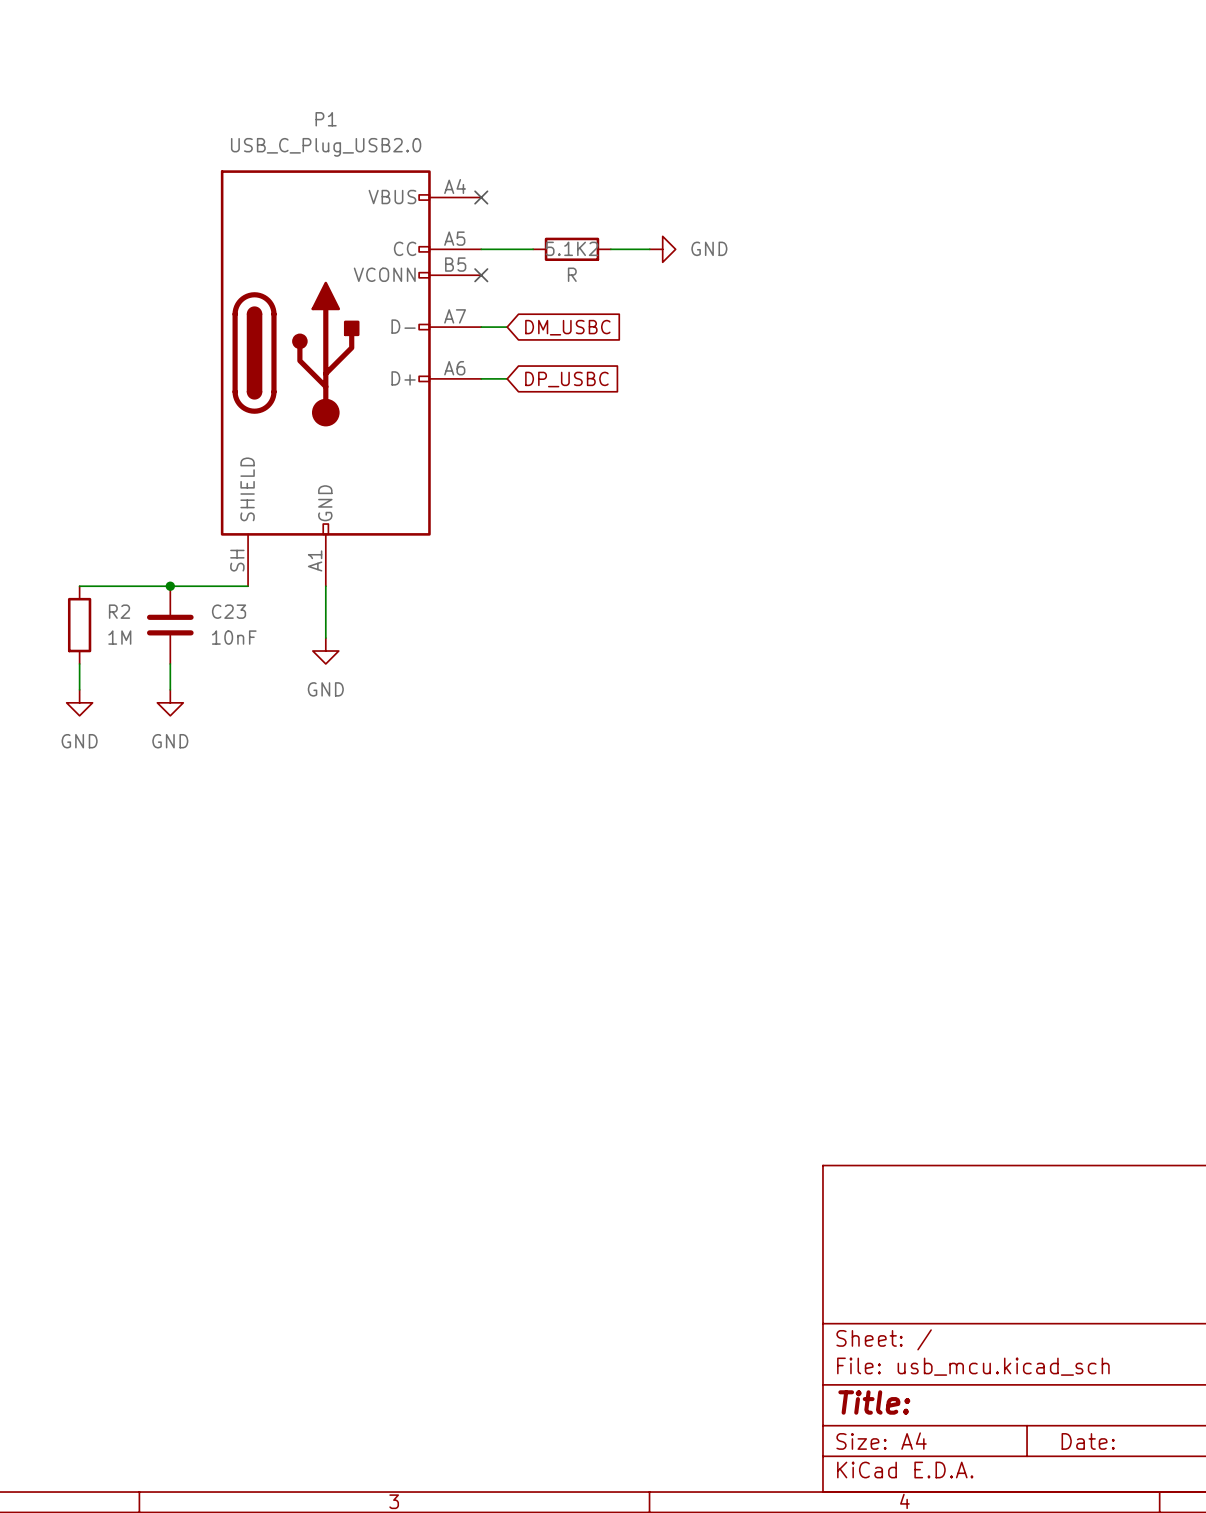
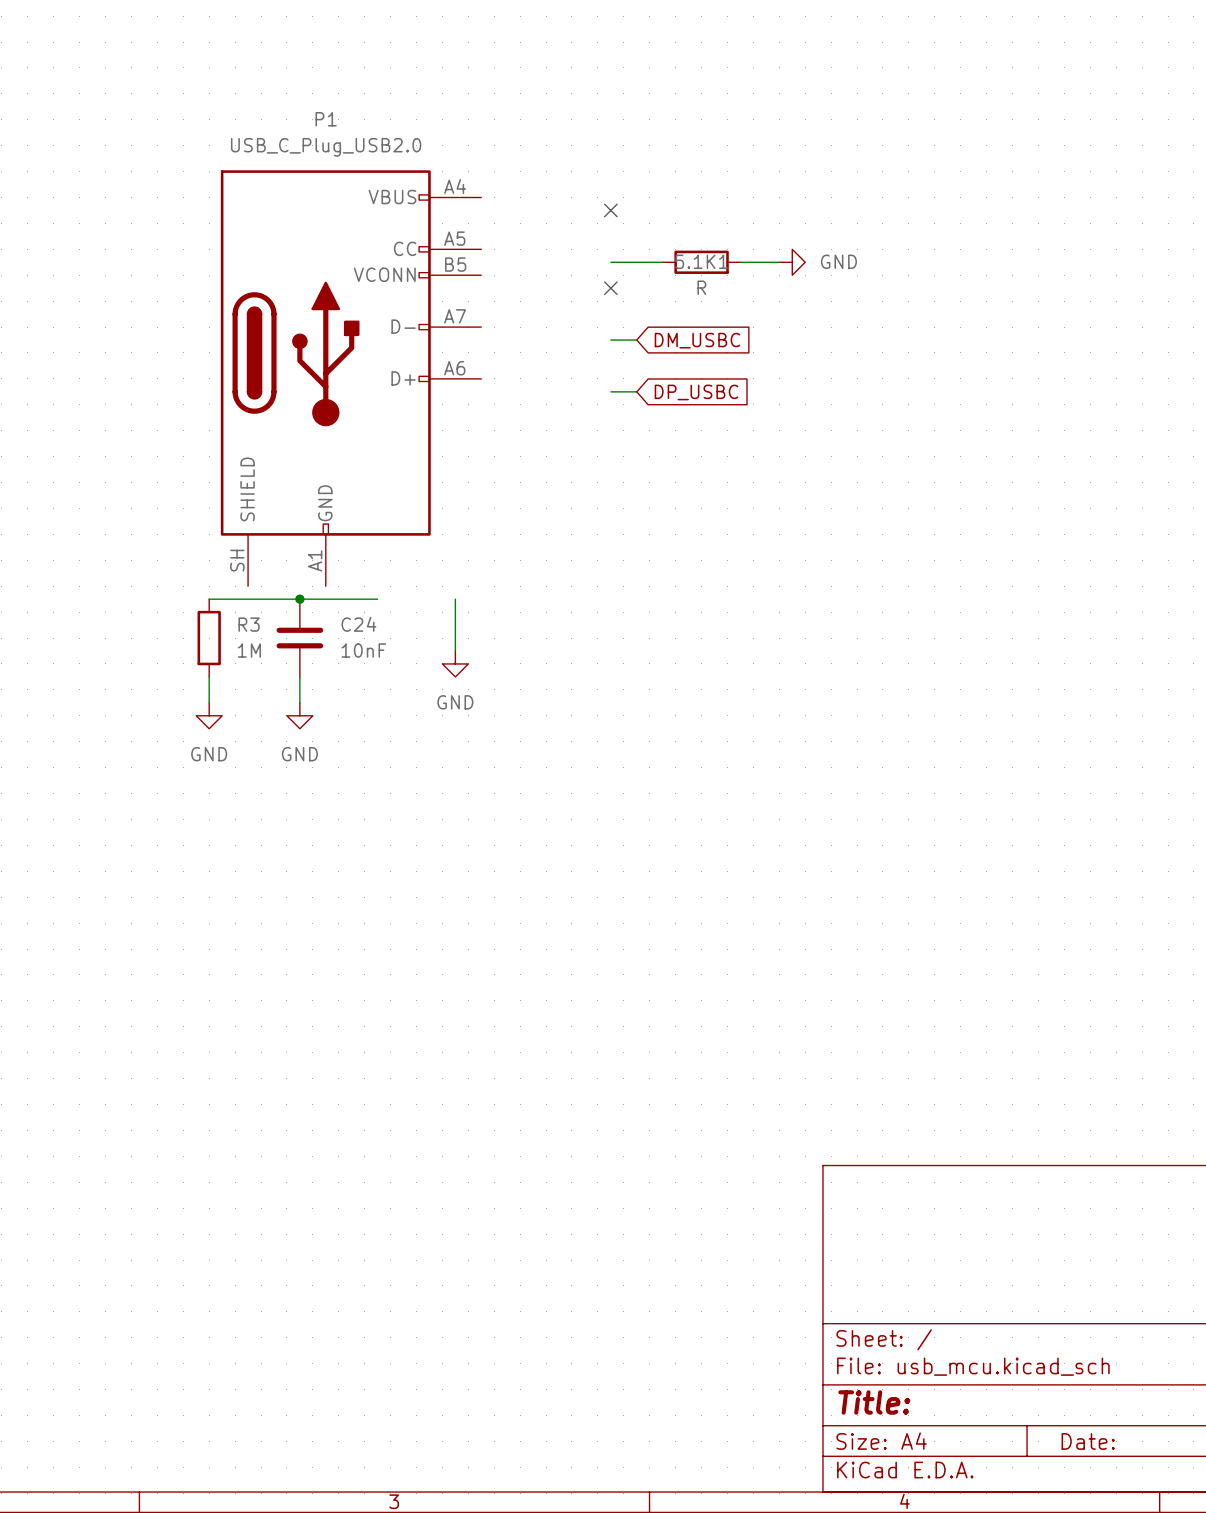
no-connect mark: (481, 197) -> none
no-connect mark: none -> (610, 210)
wire: (481, 249) (533, 249) -> (610, 262) (662, 262)
5.1K2: R (571, 249) -> none
wire: (610, 249) (649, 249) -> (740, 262) (779, 262)
power symbol position: GND (662, 249) -> GND (792, 262)
5.1K1: none -> R (701, 262)
no-connect mark: (481, 275) -> none
no-connect mark: none -> (610, 288)
wire: (481, 327) (507, 327) -> (610, 340) (636, 340)
global label position: DM_USBC (567, 327) -> DM_USBC (697, 340)
wire: (481, 378) (507, 378) -> (610, 391) (636, 391)
global label position: DP_USBC (566, 379) -> DP_USBC (696, 392)
wire: (79, 586) (248, 586) -> (209, 599) (377, 599)
junction: (170, 586) -> none
wire: (325, 586) (325, 638) -> (455, 599) (455, 651)
junction: none -> (299, 599)
R2: 1M (79, 625) -> none
C23: 10nF (170, 625) -> none
R3: none -> 1M (209, 638)
C24: none -> 10nF (299, 638)
power symbol: GND (325, 651) -> none
wire: (79, 663) (79, 689) -> (209, 676) (209, 702)
wire: (170, 663) (170, 689) -> (299, 676) (299, 702)
power symbol: none -> GND (455, 663)
power symbol: GND (79, 702) -> none
power symbol position: GND (170, 702) -> GND (209, 715)
power symbol: none -> GND (299, 715)

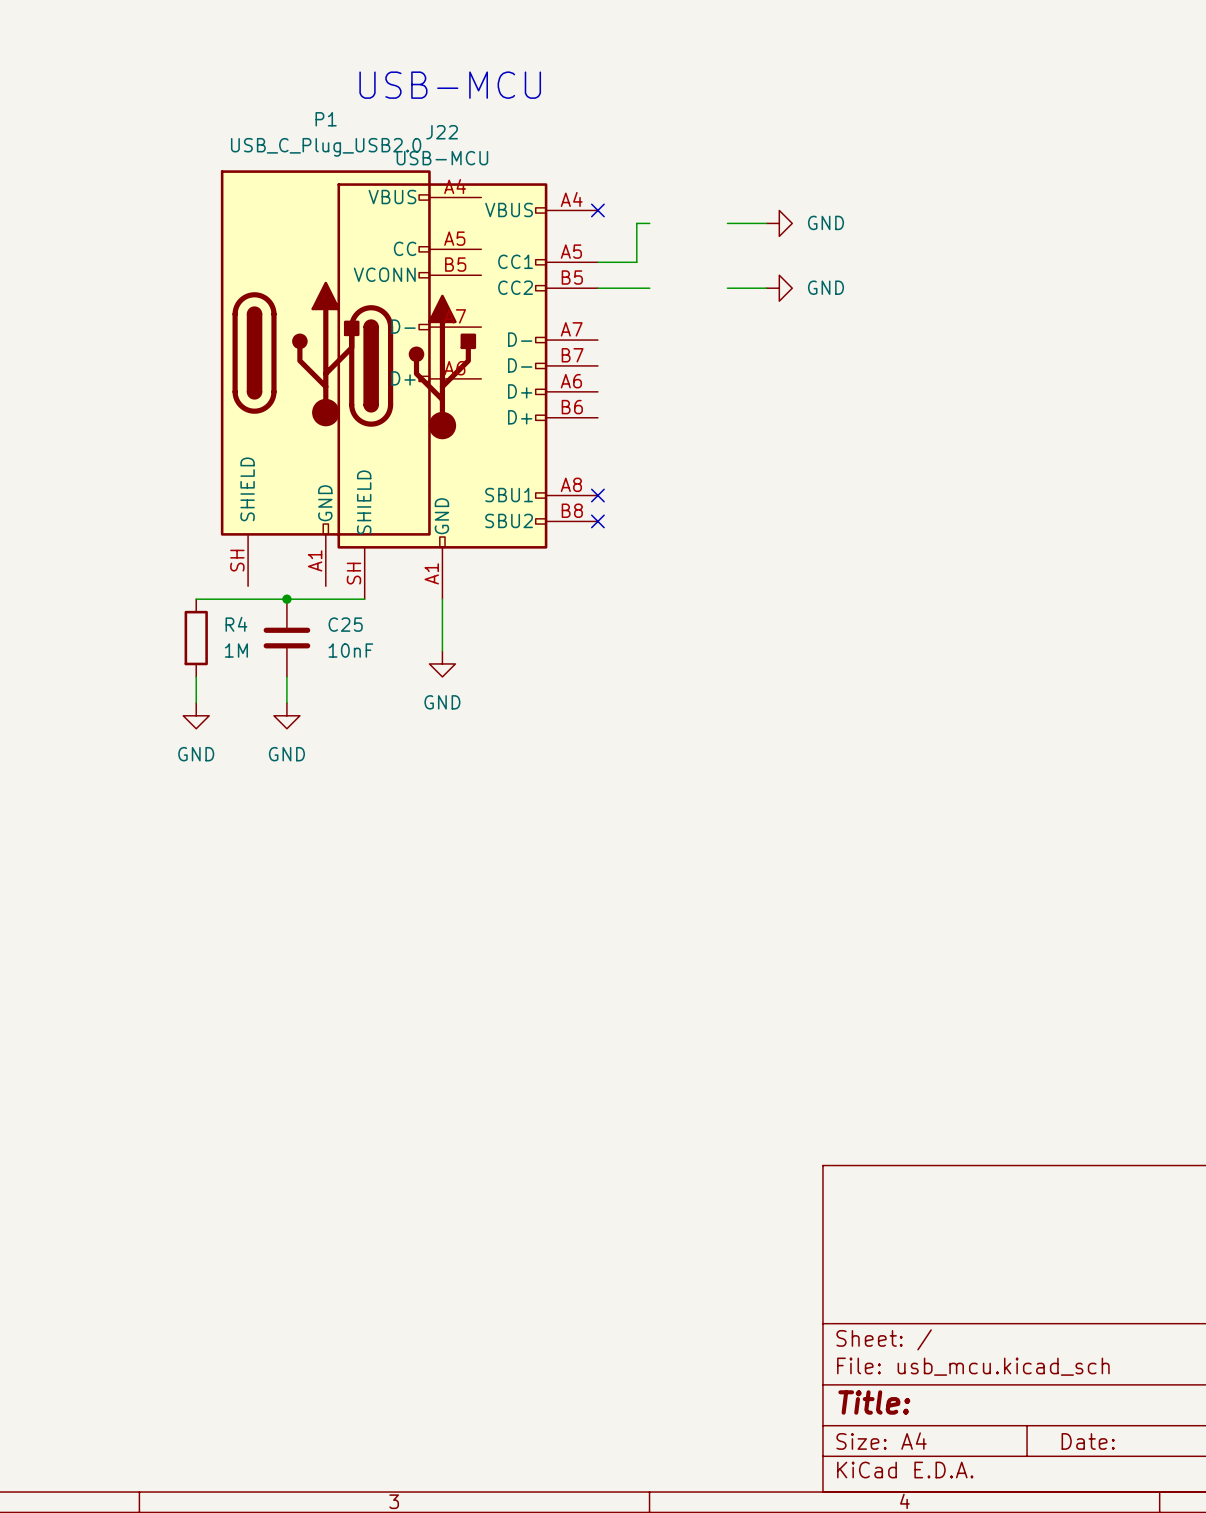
text: none -> USB-MCU (450, 85)
no-connect mark position: (610, 210) -> (597, 210)
wire: none -> (727, 223) (766, 223)
power symbol: none -> GND (779, 223)
wire: none -> (597, 262) (610, 262)
wire: (636, 262) (662, 262) -> (636, 262) (636, 223) (649, 223)
5.1K1: R (701, 262) -> none
wire: (740, 262) (779, 262) -> (727, 288) (766, 288)
power symbol: GND (792, 262) -> none
wire: none -> (597, 288) (649, 288)
no-connect mark: (610, 288) -> none
power symbol: none -> GND (779, 288)
wire: (610, 340) (636, 340) -> none
global label: DM_USBC (697, 340) -> none
J22: none -> USB-MCU (467, 391)
wire: (610, 391) (636, 391) -> none
global label: DP_USBC (696, 392) -> none
no-connect mark: none -> (597, 495)
no-connect mark: none -> (597, 521)
junction position: (299, 599) -> (286, 599)
wire: (364, 599) (377, 599) -> (196, 599) (209, 599)
wire: (455, 599) (455, 651) -> (442, 599) (442, 651)
R4: none -> 1M (196, 638)
R3: 1M (209, 638) -> none
C25: none -> 10nF (286, 638)
C24: 10nF (299, 638) -> none
power symbol position: GND (455, 663) -> GND (442, 663)
wire: (209, 676) (209, 702) -> (196, 676) (196, 702)
wire: (299, 676) (299, 702) -> (286, 676) (286, 702)
power symbol position: GND (209, 715) -> GND (196, 715)
power symbol position: GND (299, 715) -> GND (286, 715)

